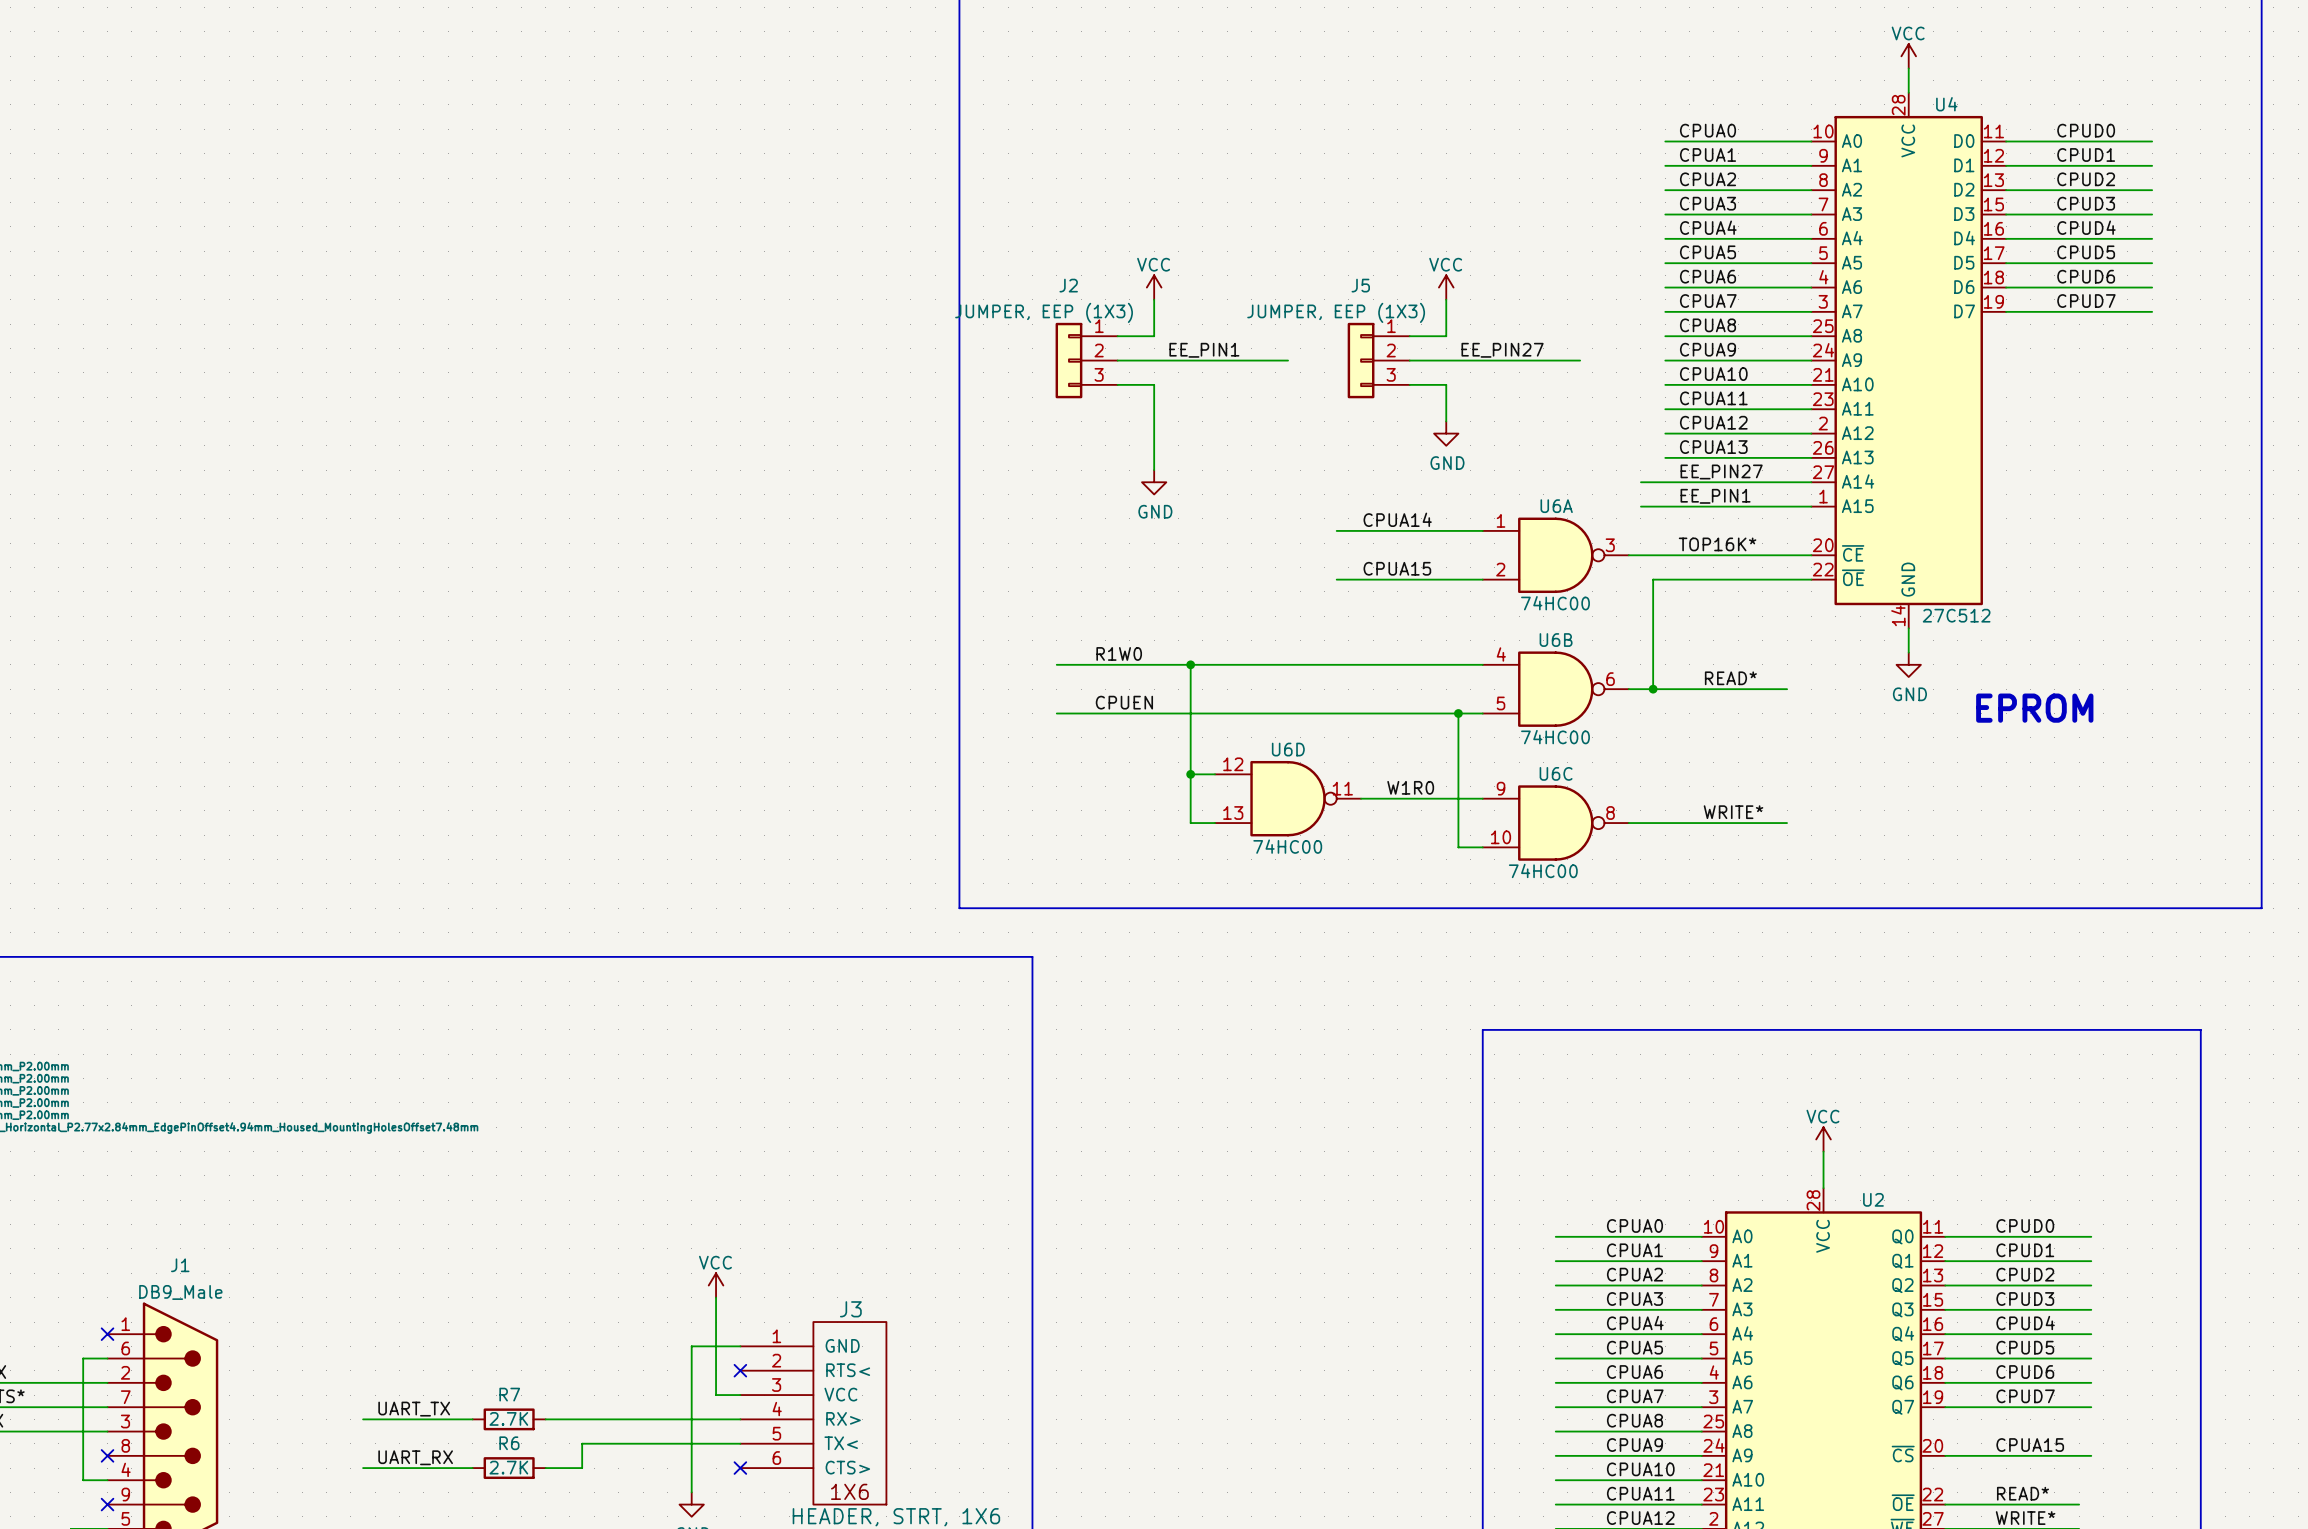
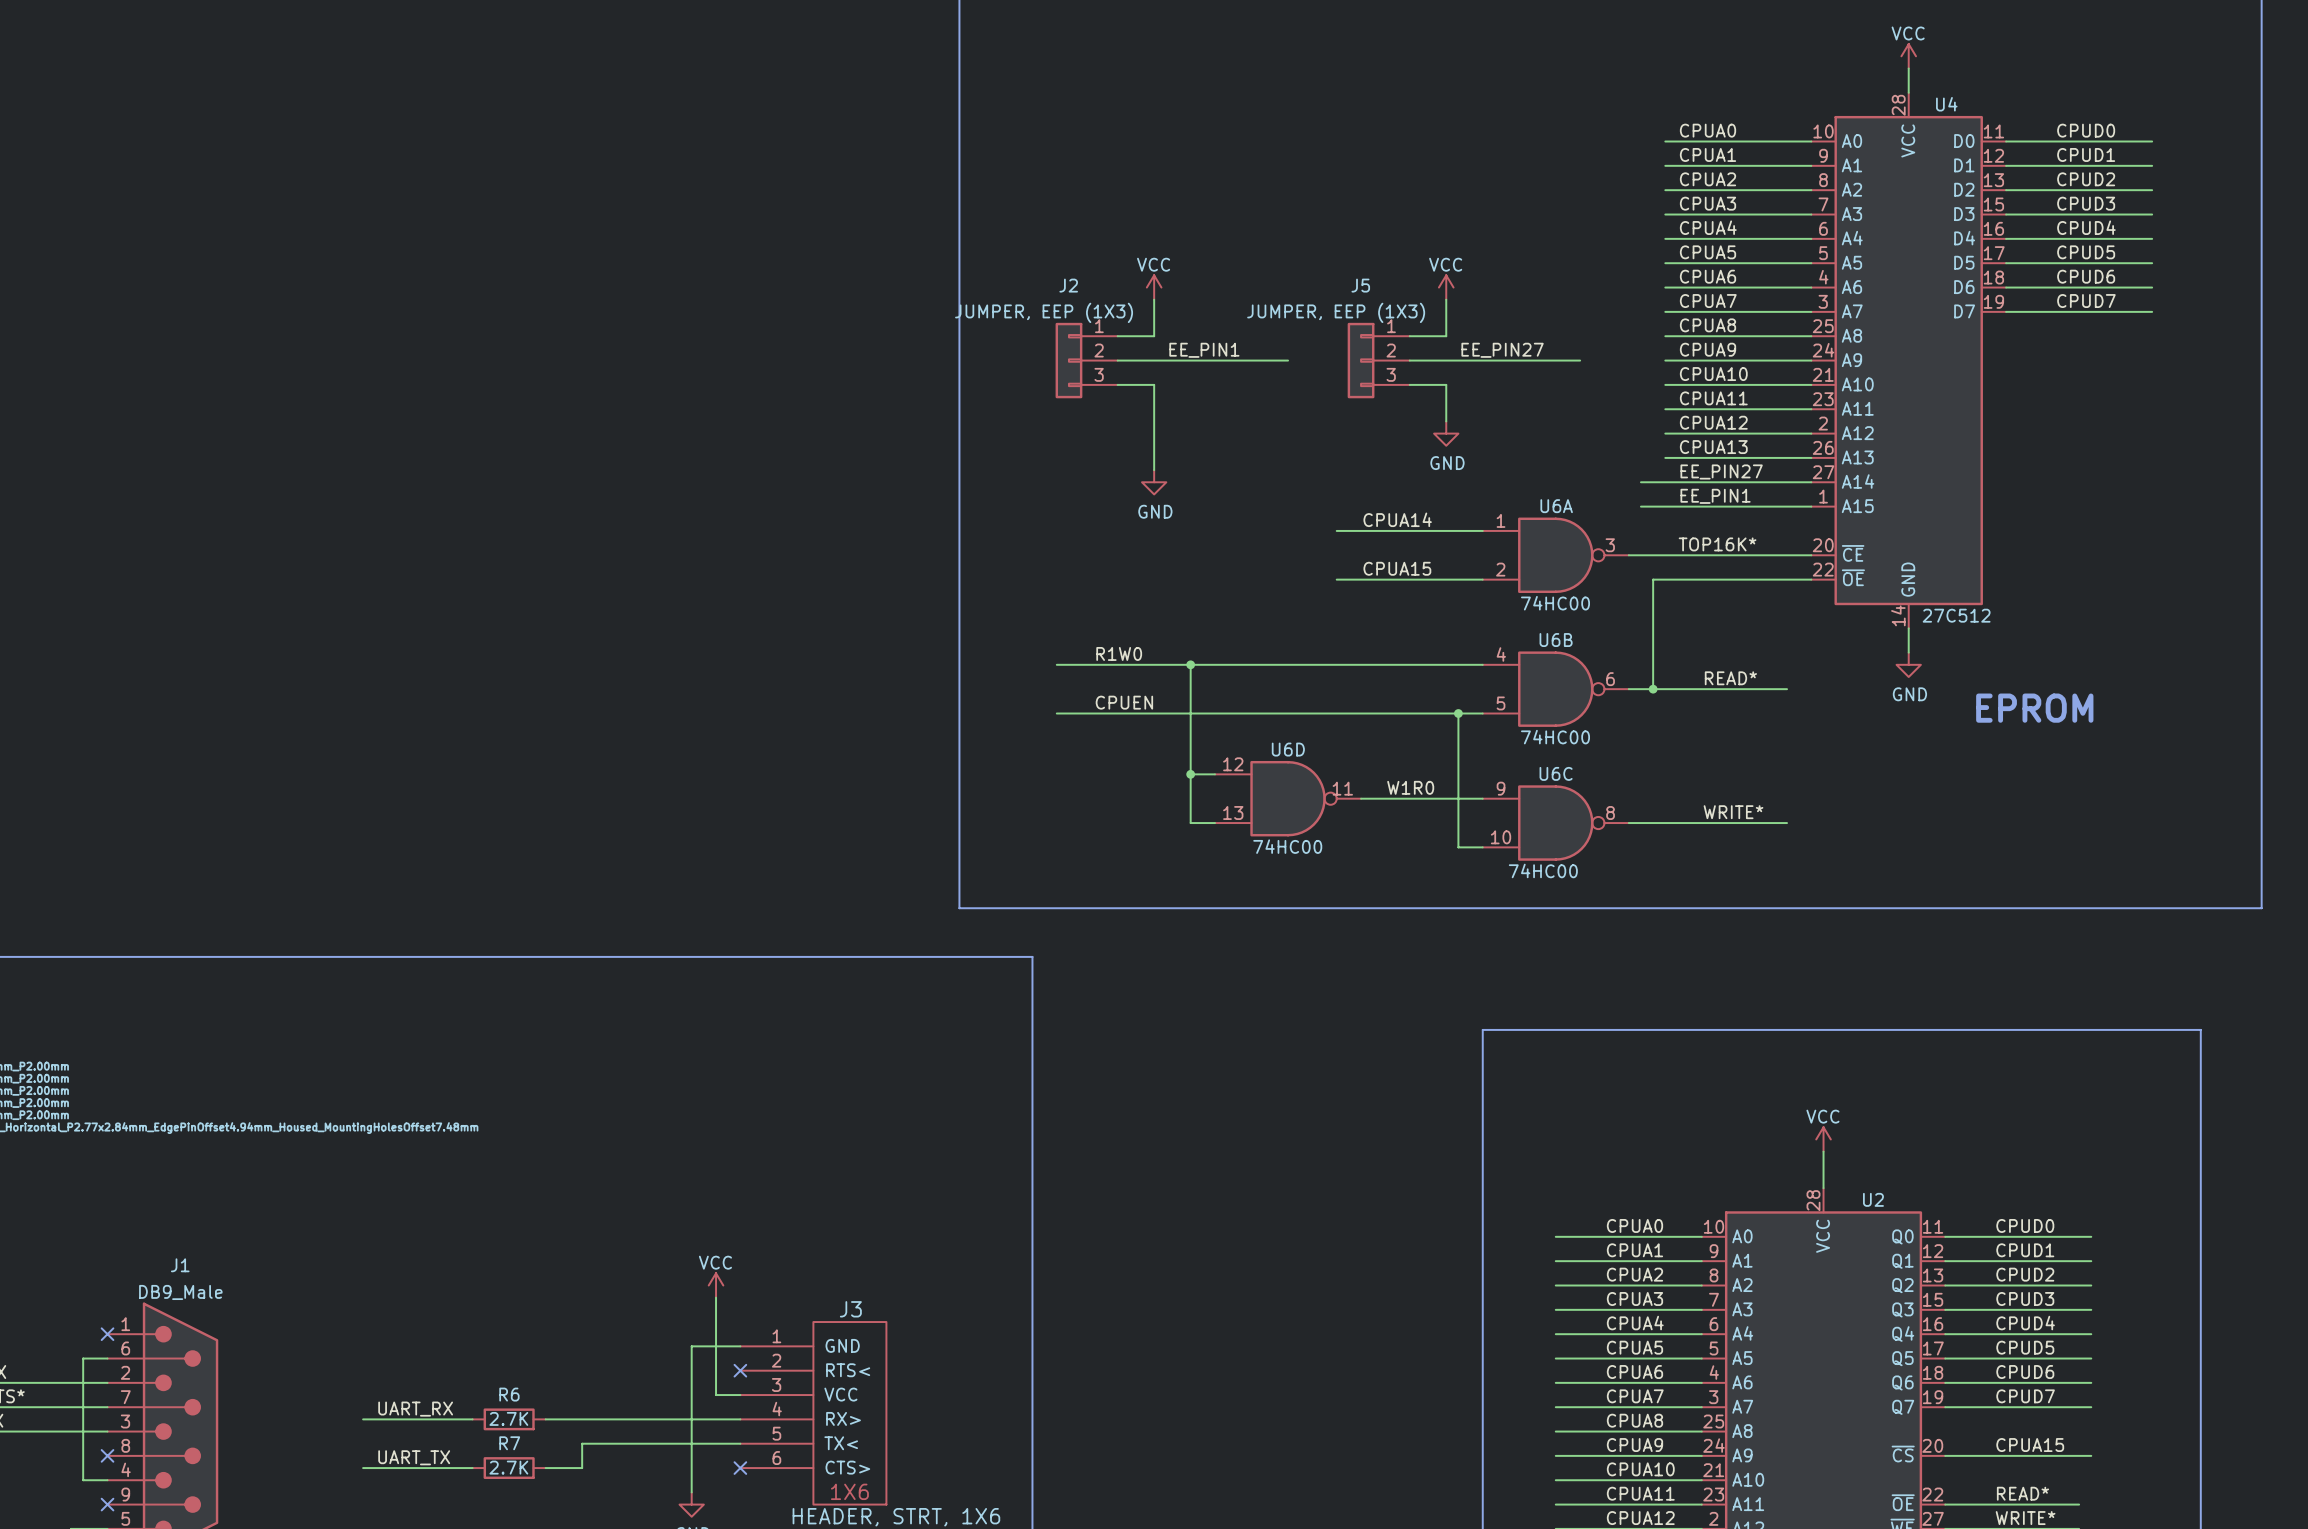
R7 name: R7 (509, 1394) -> R6 (509, 1394)
label: UART_TX (414, 1409) -> UART_RX (415, 1409)
R6 name: R6 (509, 1443) -> R7 (509, 1443)
label: UART_RX (415, 1457) -> UART_TX (414, 1457)

